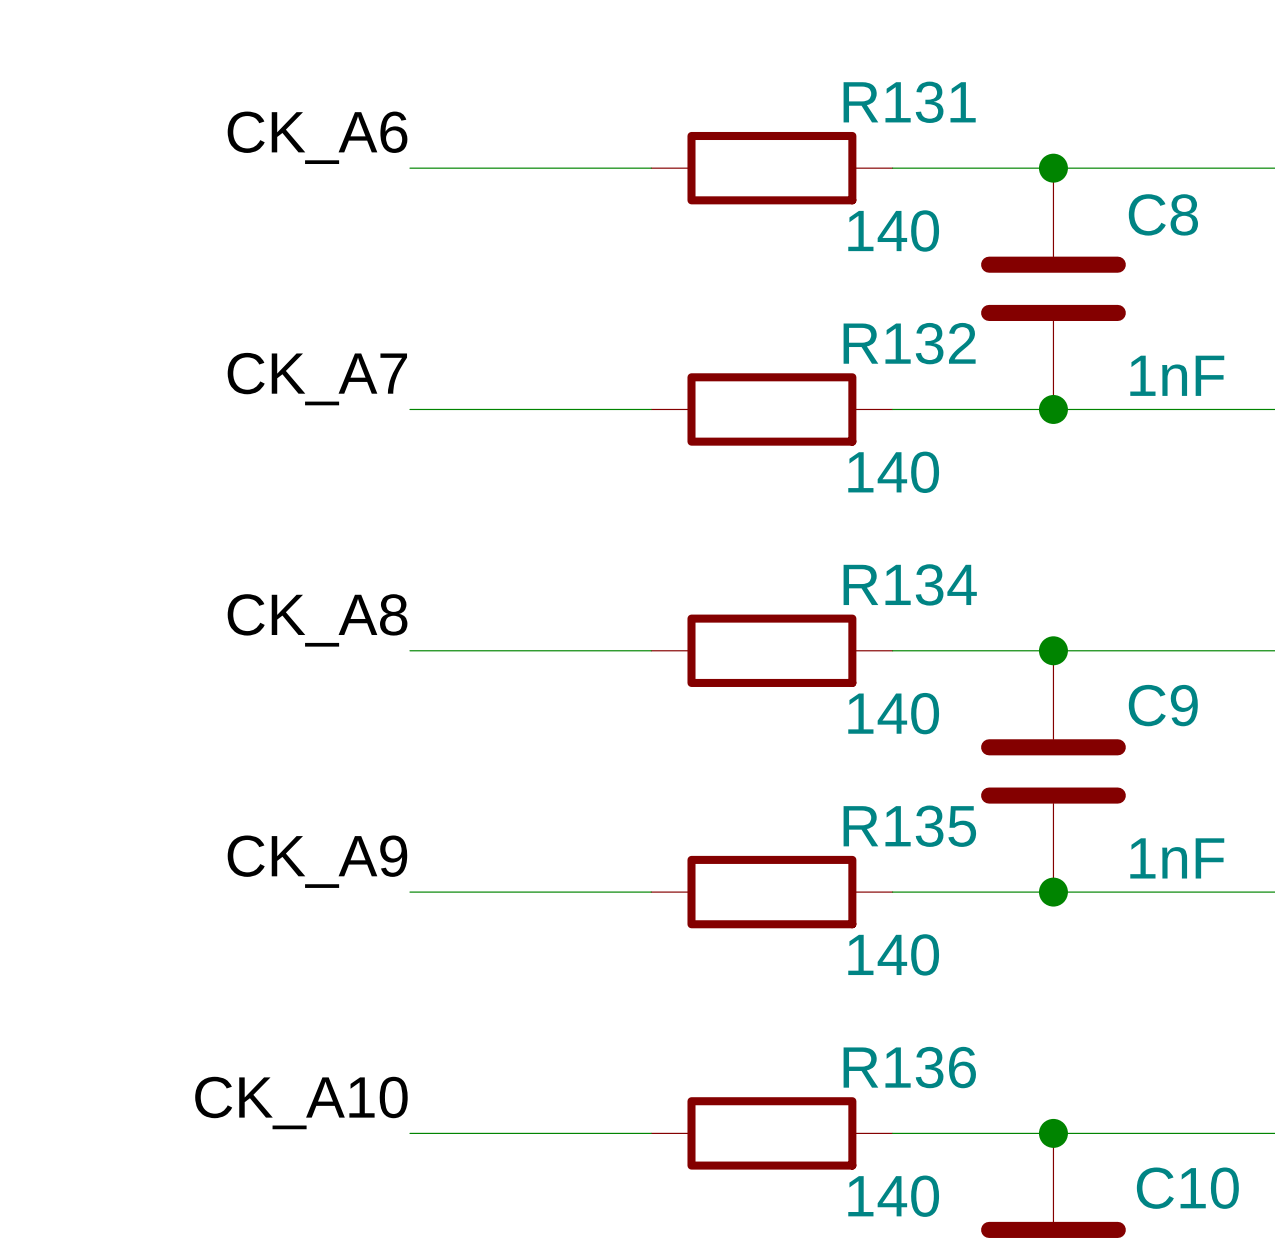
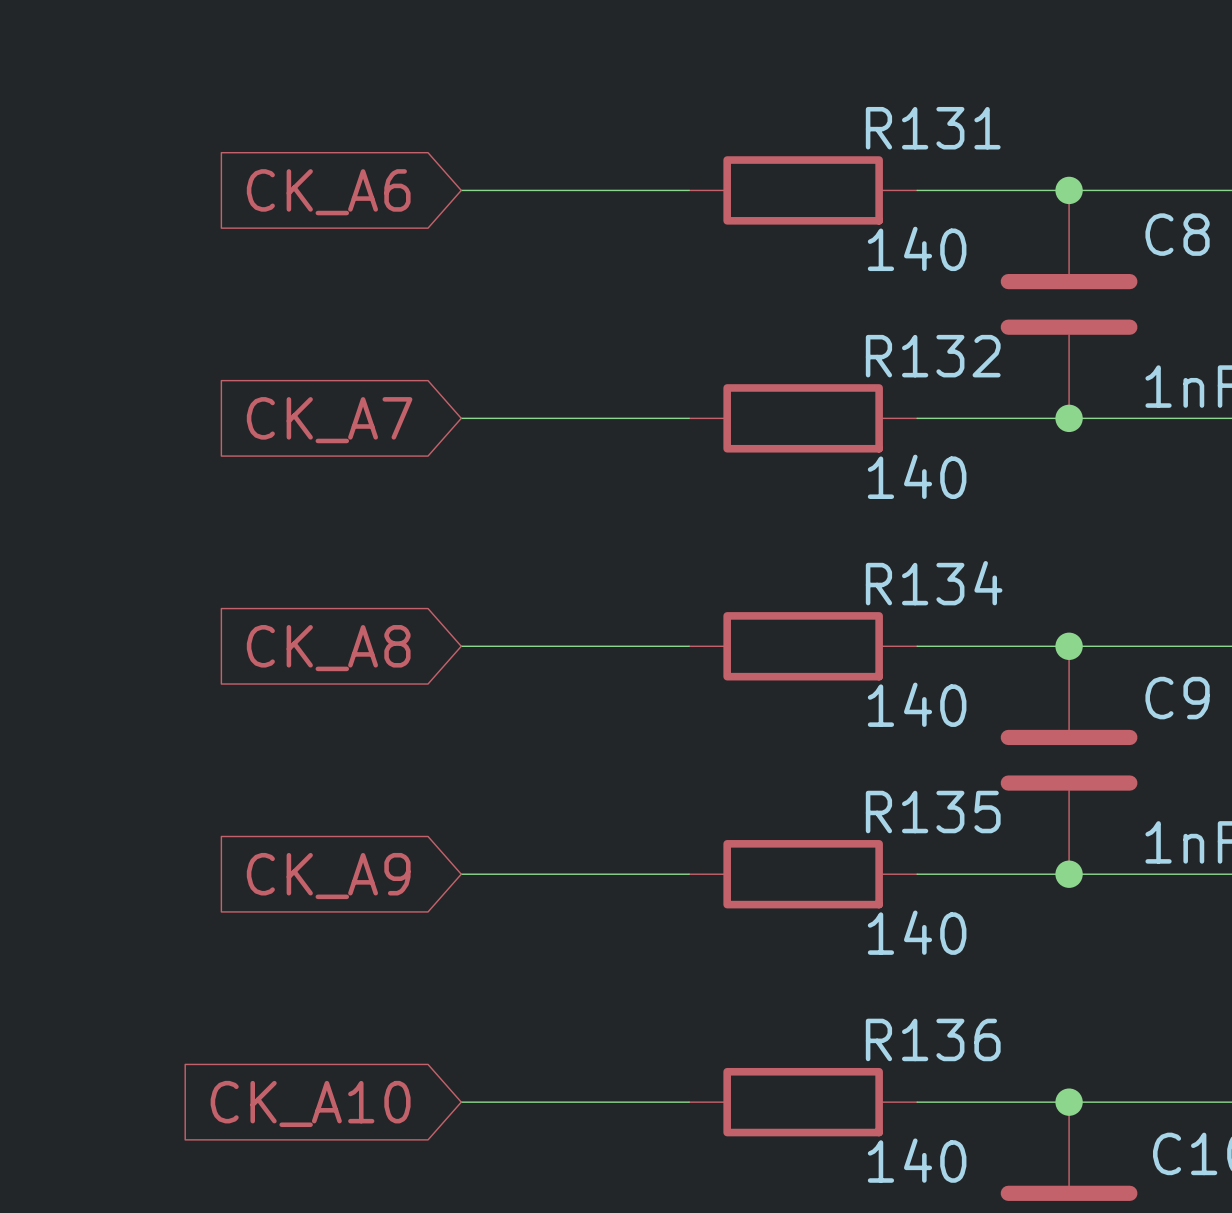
label: CK_A6 (317, 137) -> none
global label: none -> CK_A6 (328, 192)
label: CK_A7 (317, 379) -> none
global label: none -> CK_A7 (329, 420)
label: CK_A8 (317, 620) -> none
global label: none -> CK_A8 (328, 648)
label: CK_A9 (317, 861) -> none
global label: none -> CK_A9 (328, 876)
label: CK_A10 (301, 1103) -> none
global label: none -> CK_A10 (310, 1103)

